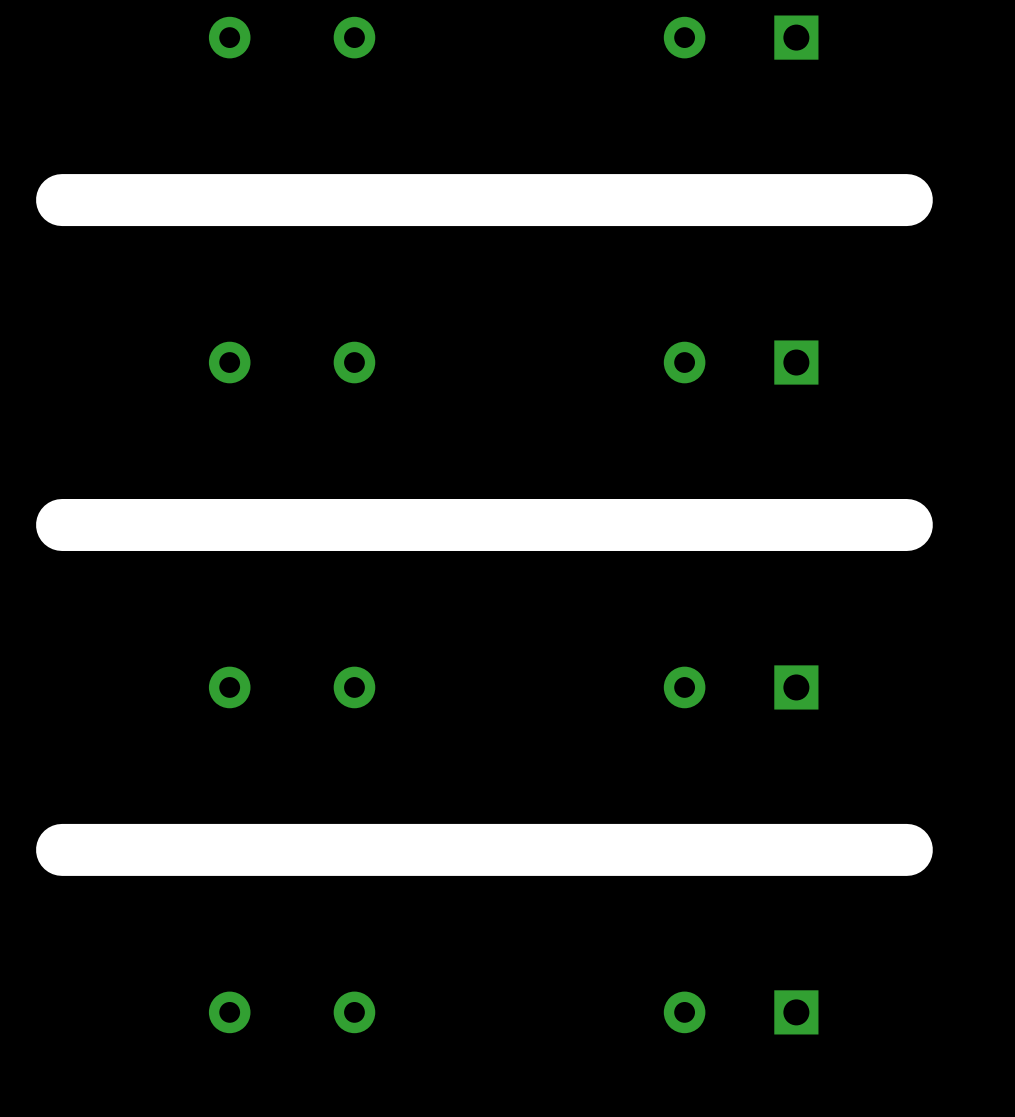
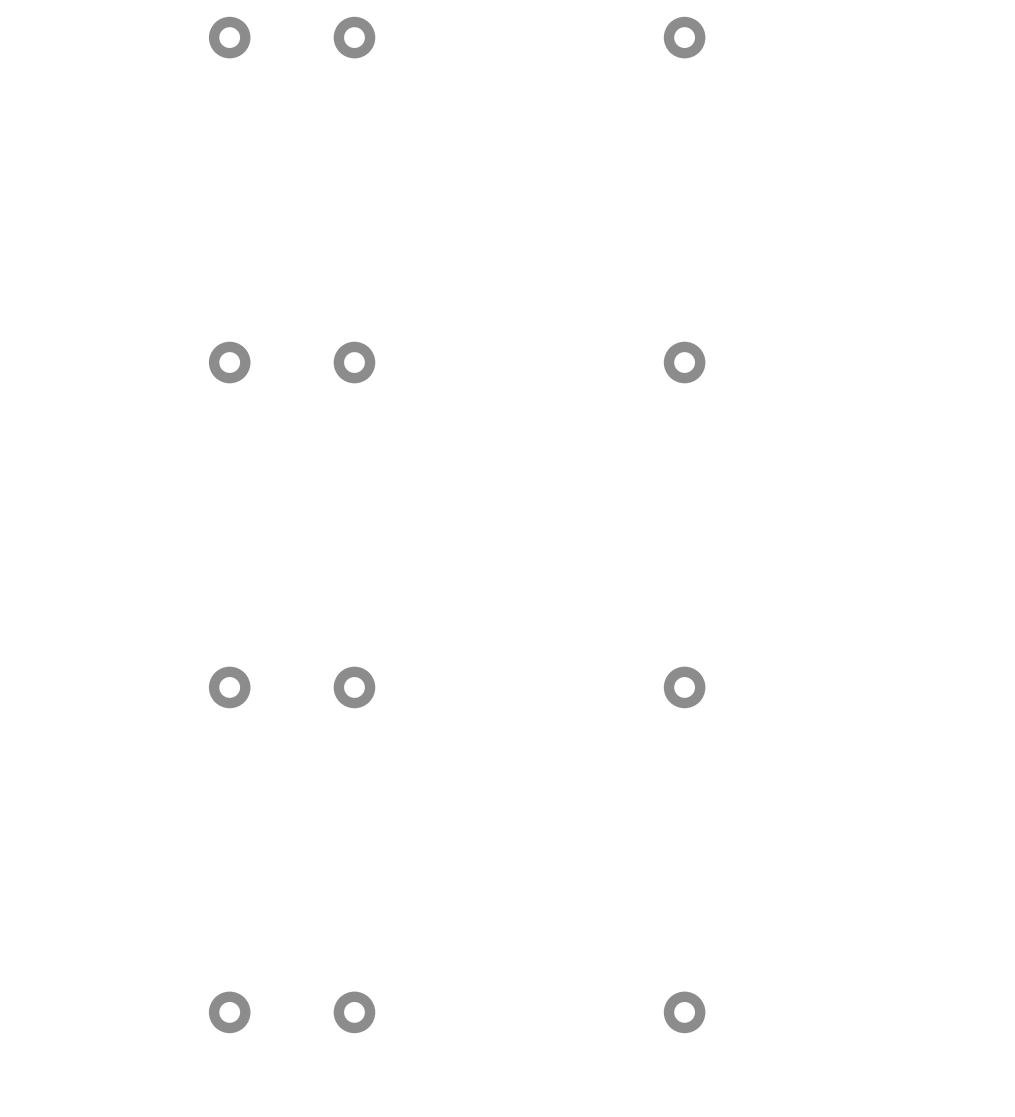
part: (796, 37) -> none
board edge: (906, 200) (62, 200) -> none
part: (796, 362) -> none
board edge: (906, 524) (62, 524) -> none
part: (796, 687) -> none
board edge: (906, 849) (62, 849) -> none
part: (796, 1012) -> none

